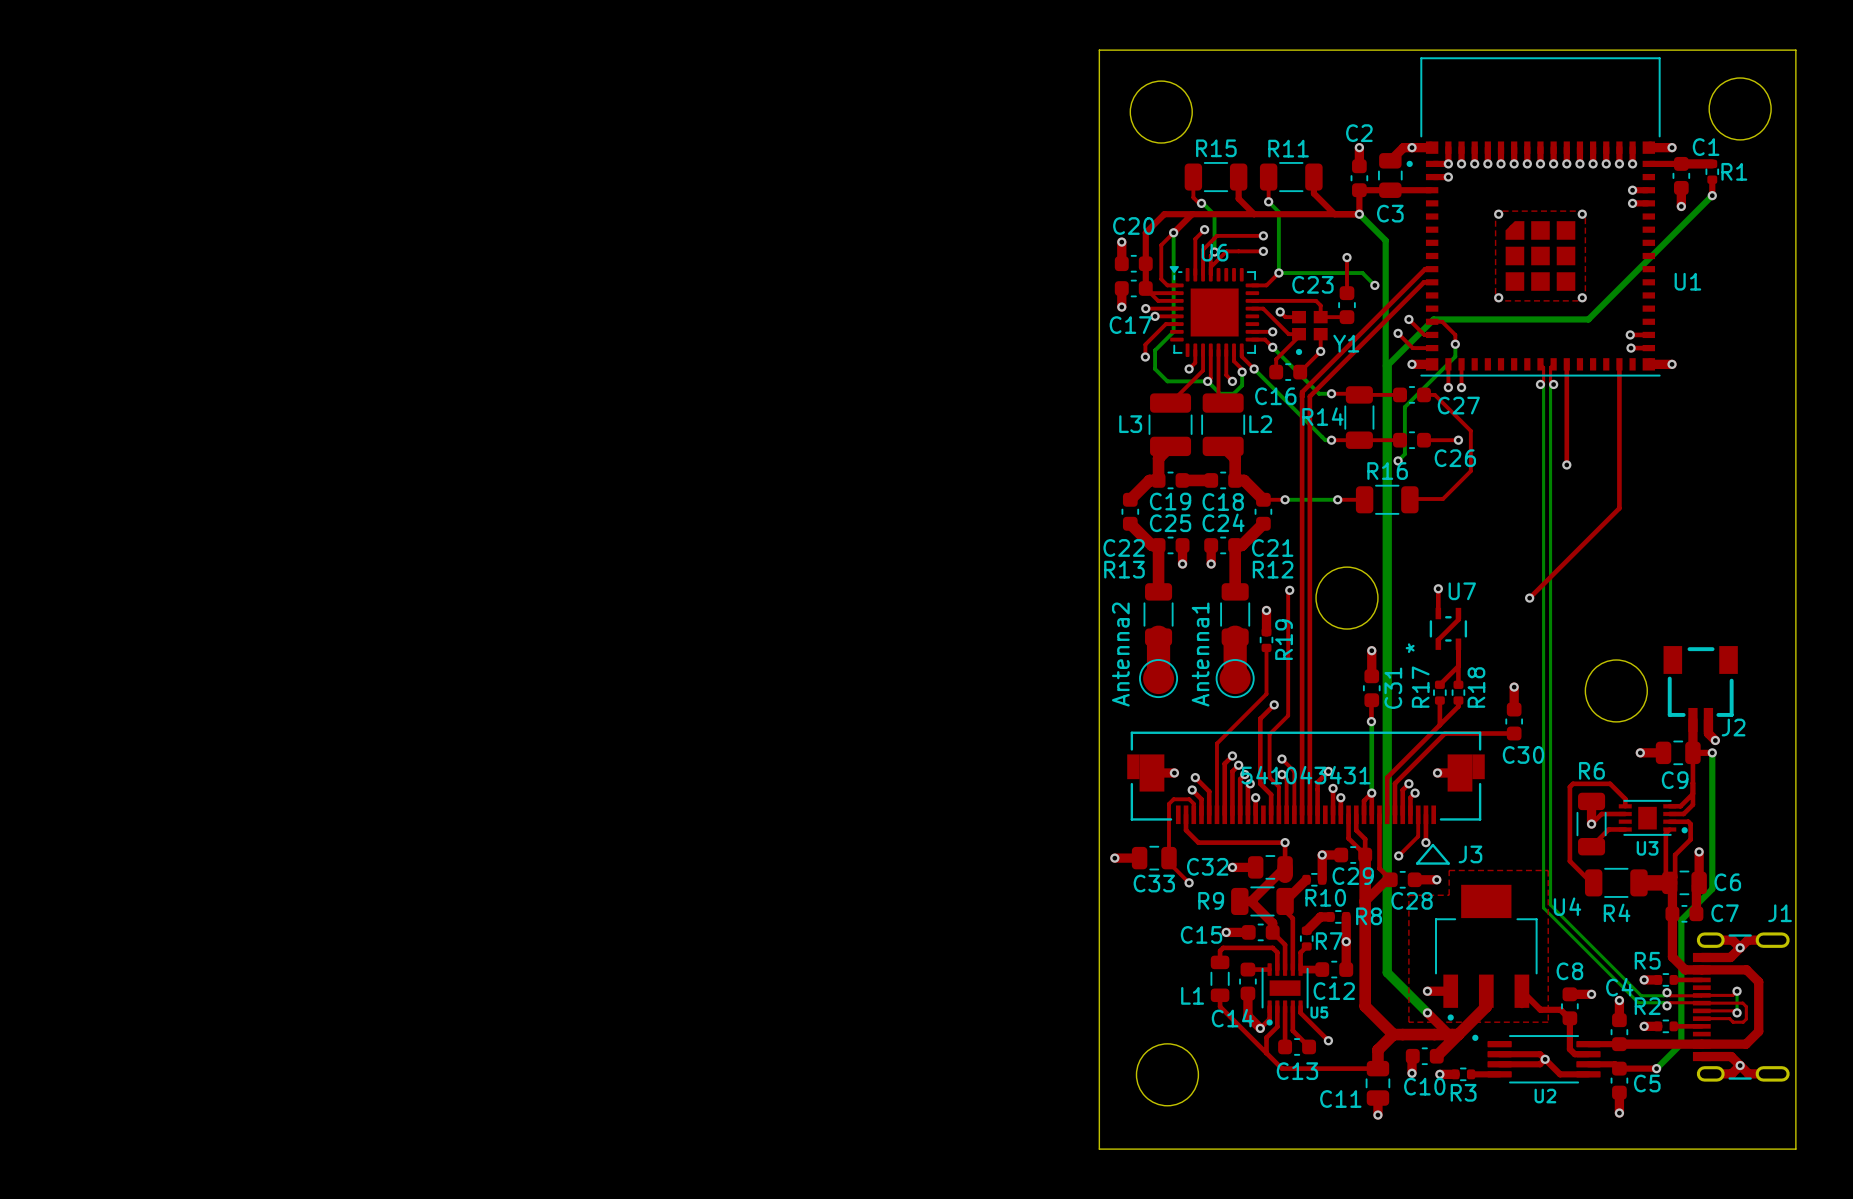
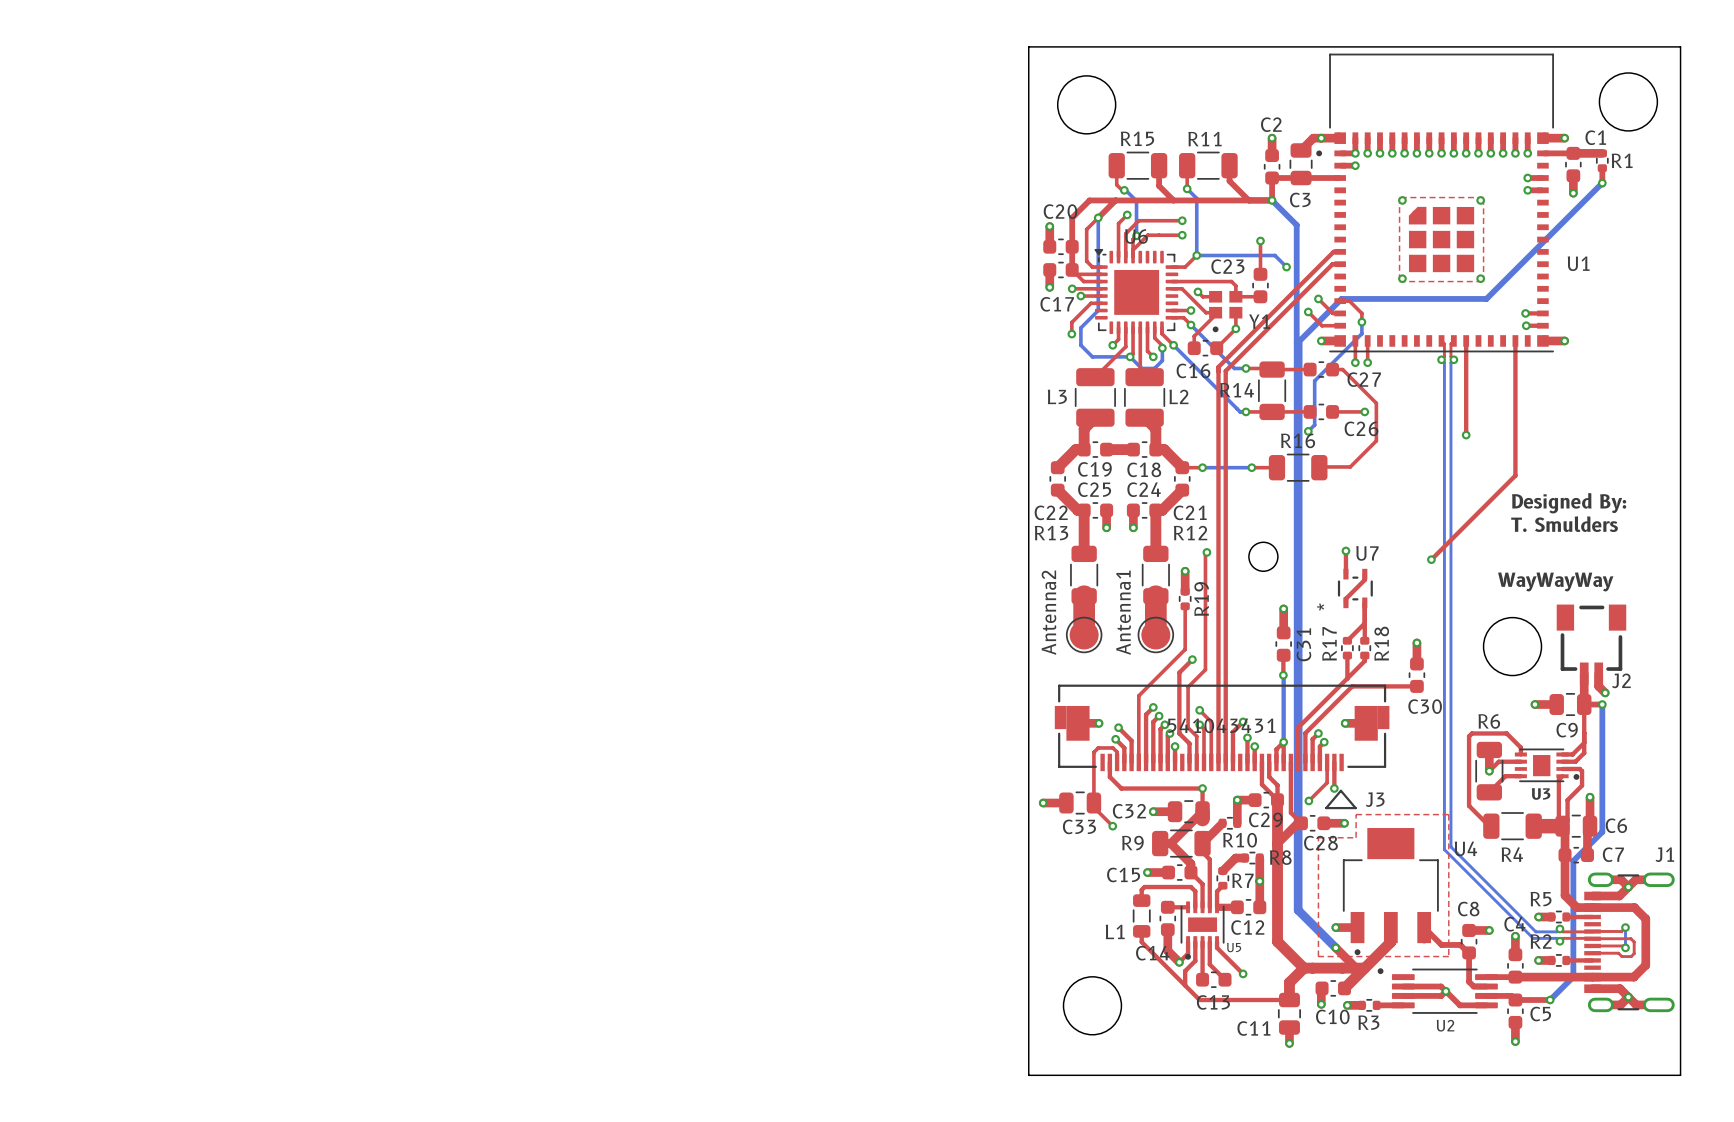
text: none -> Designed By: (1569, 503)
text: none -> T. Smulders (1564, 524)
round board edge size: [1315, 566, 1379, 630] -> [1248, 541, 1279, 572]
text: none -> WayWayWay (1555, 581)

